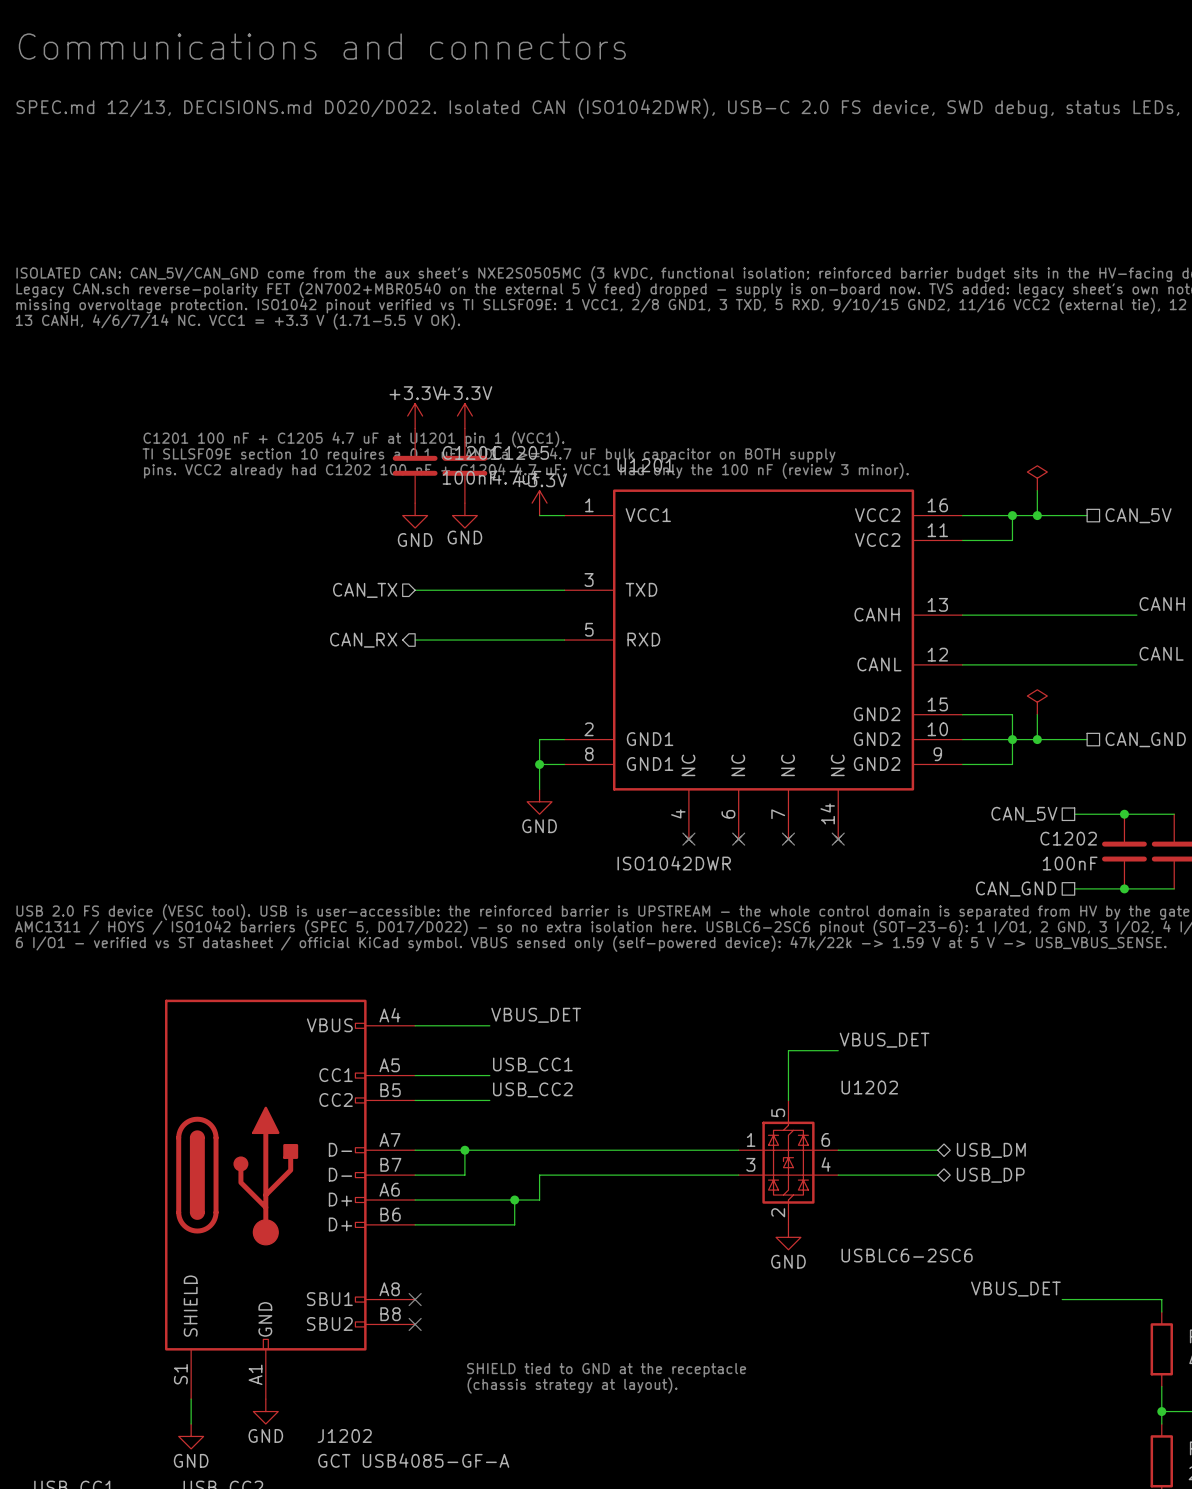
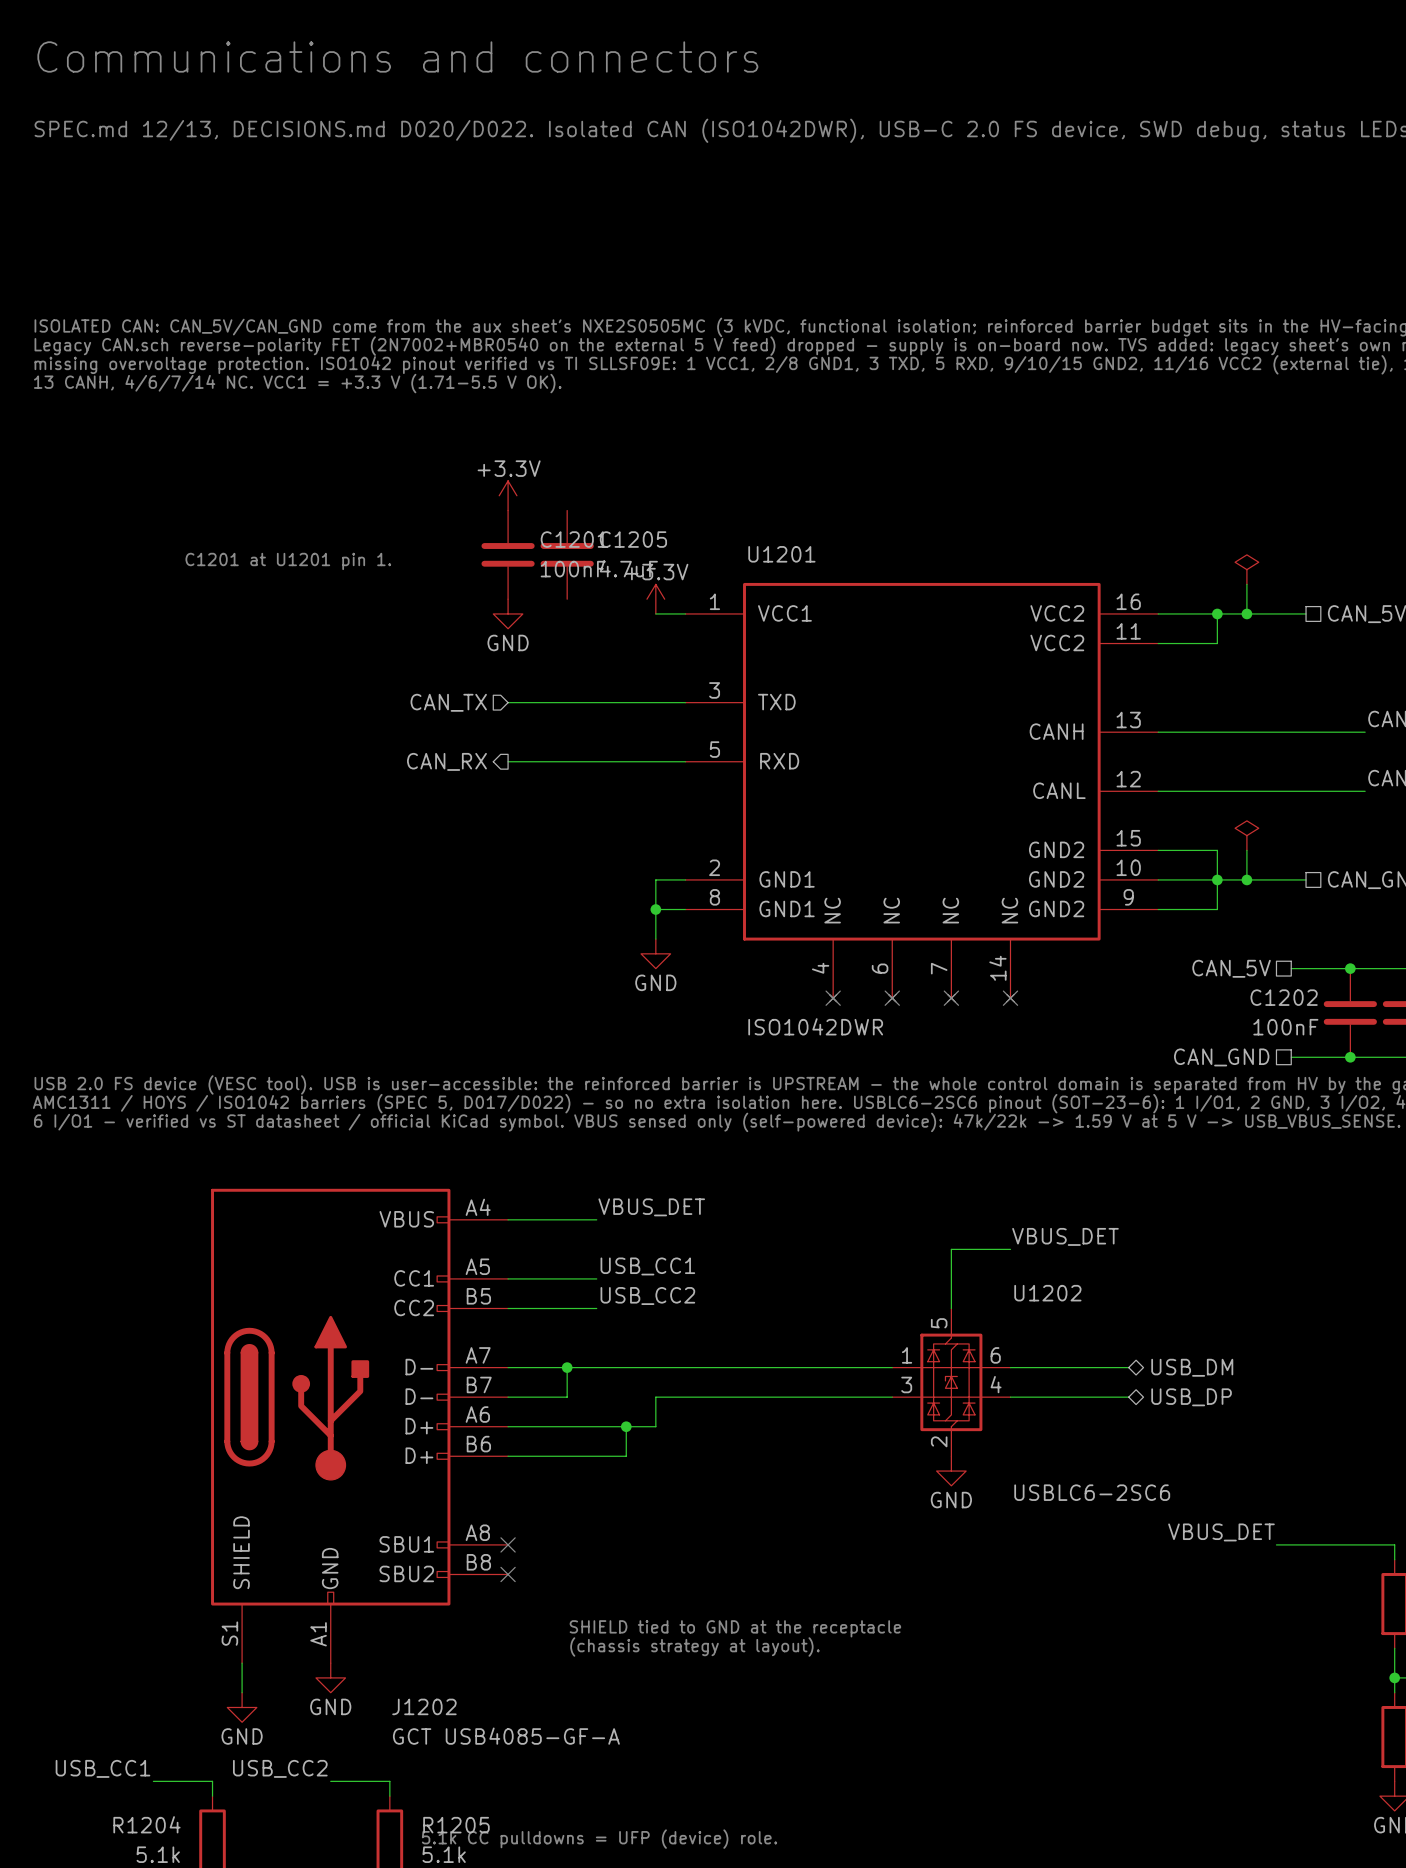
power symbol: +3.3V (464, 416) -> none
text: C1201 100 nF + C1205 4.7 uF at U1201 pin 1 (VCC1). (353, 439) -> none
text: TI SLLSF09E section 10 requires a 0.1 uF AND a >= 4.7 uF bulk capacitor on BOTH supply (489, 455) -> none
text: pins. VCC2 already had C1202 100 nF + C1204 4.7 uF; VCC1 had only the 100 nF (review 3 minor). (526, 470) -> C1201 at U1201 pin 1. (288, 561)
power symbol: GND (464, 515) -> none

